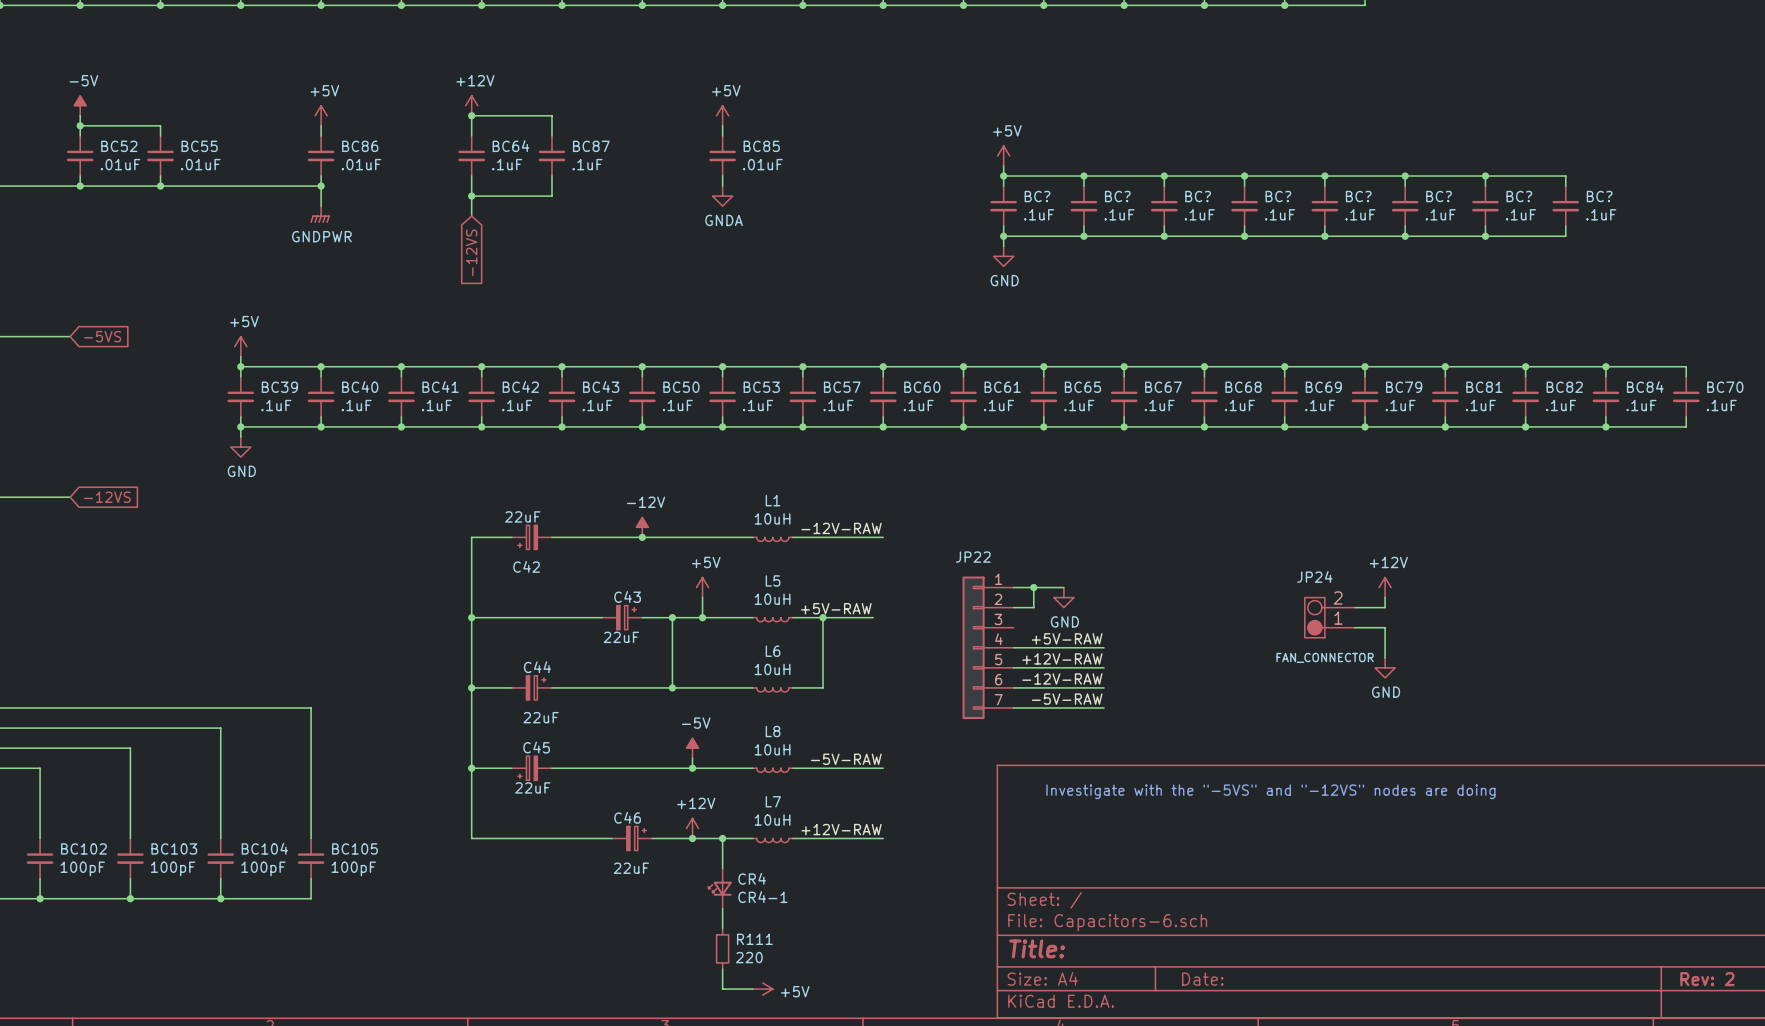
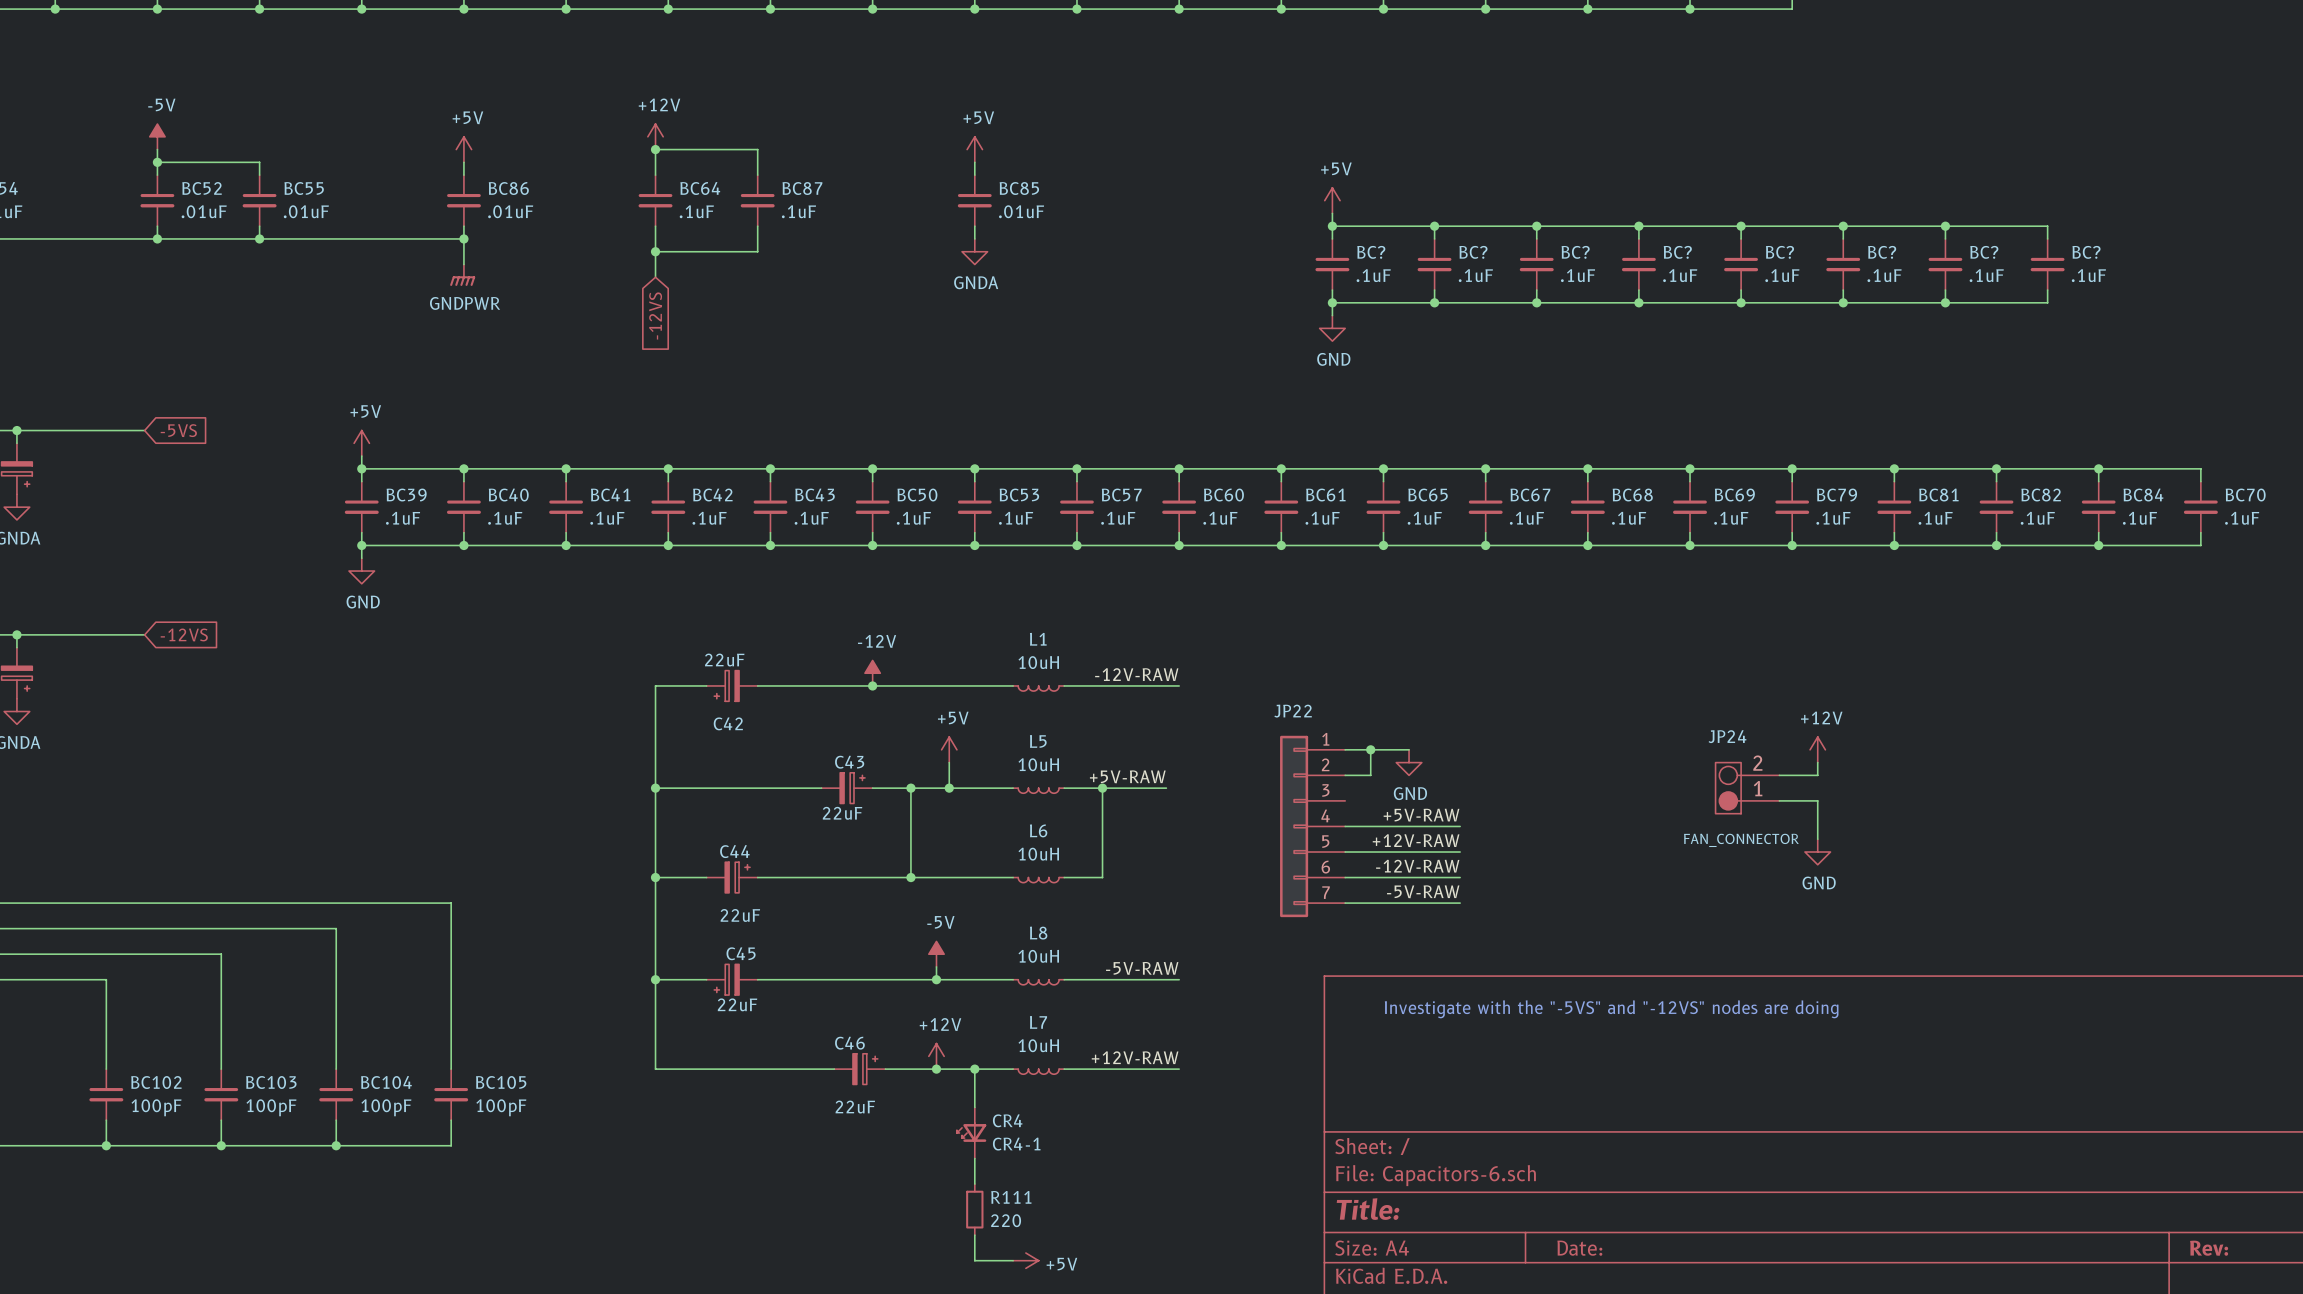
title block: Rev: 2 (1707, 979) -> Rev: (2209, 1248)

